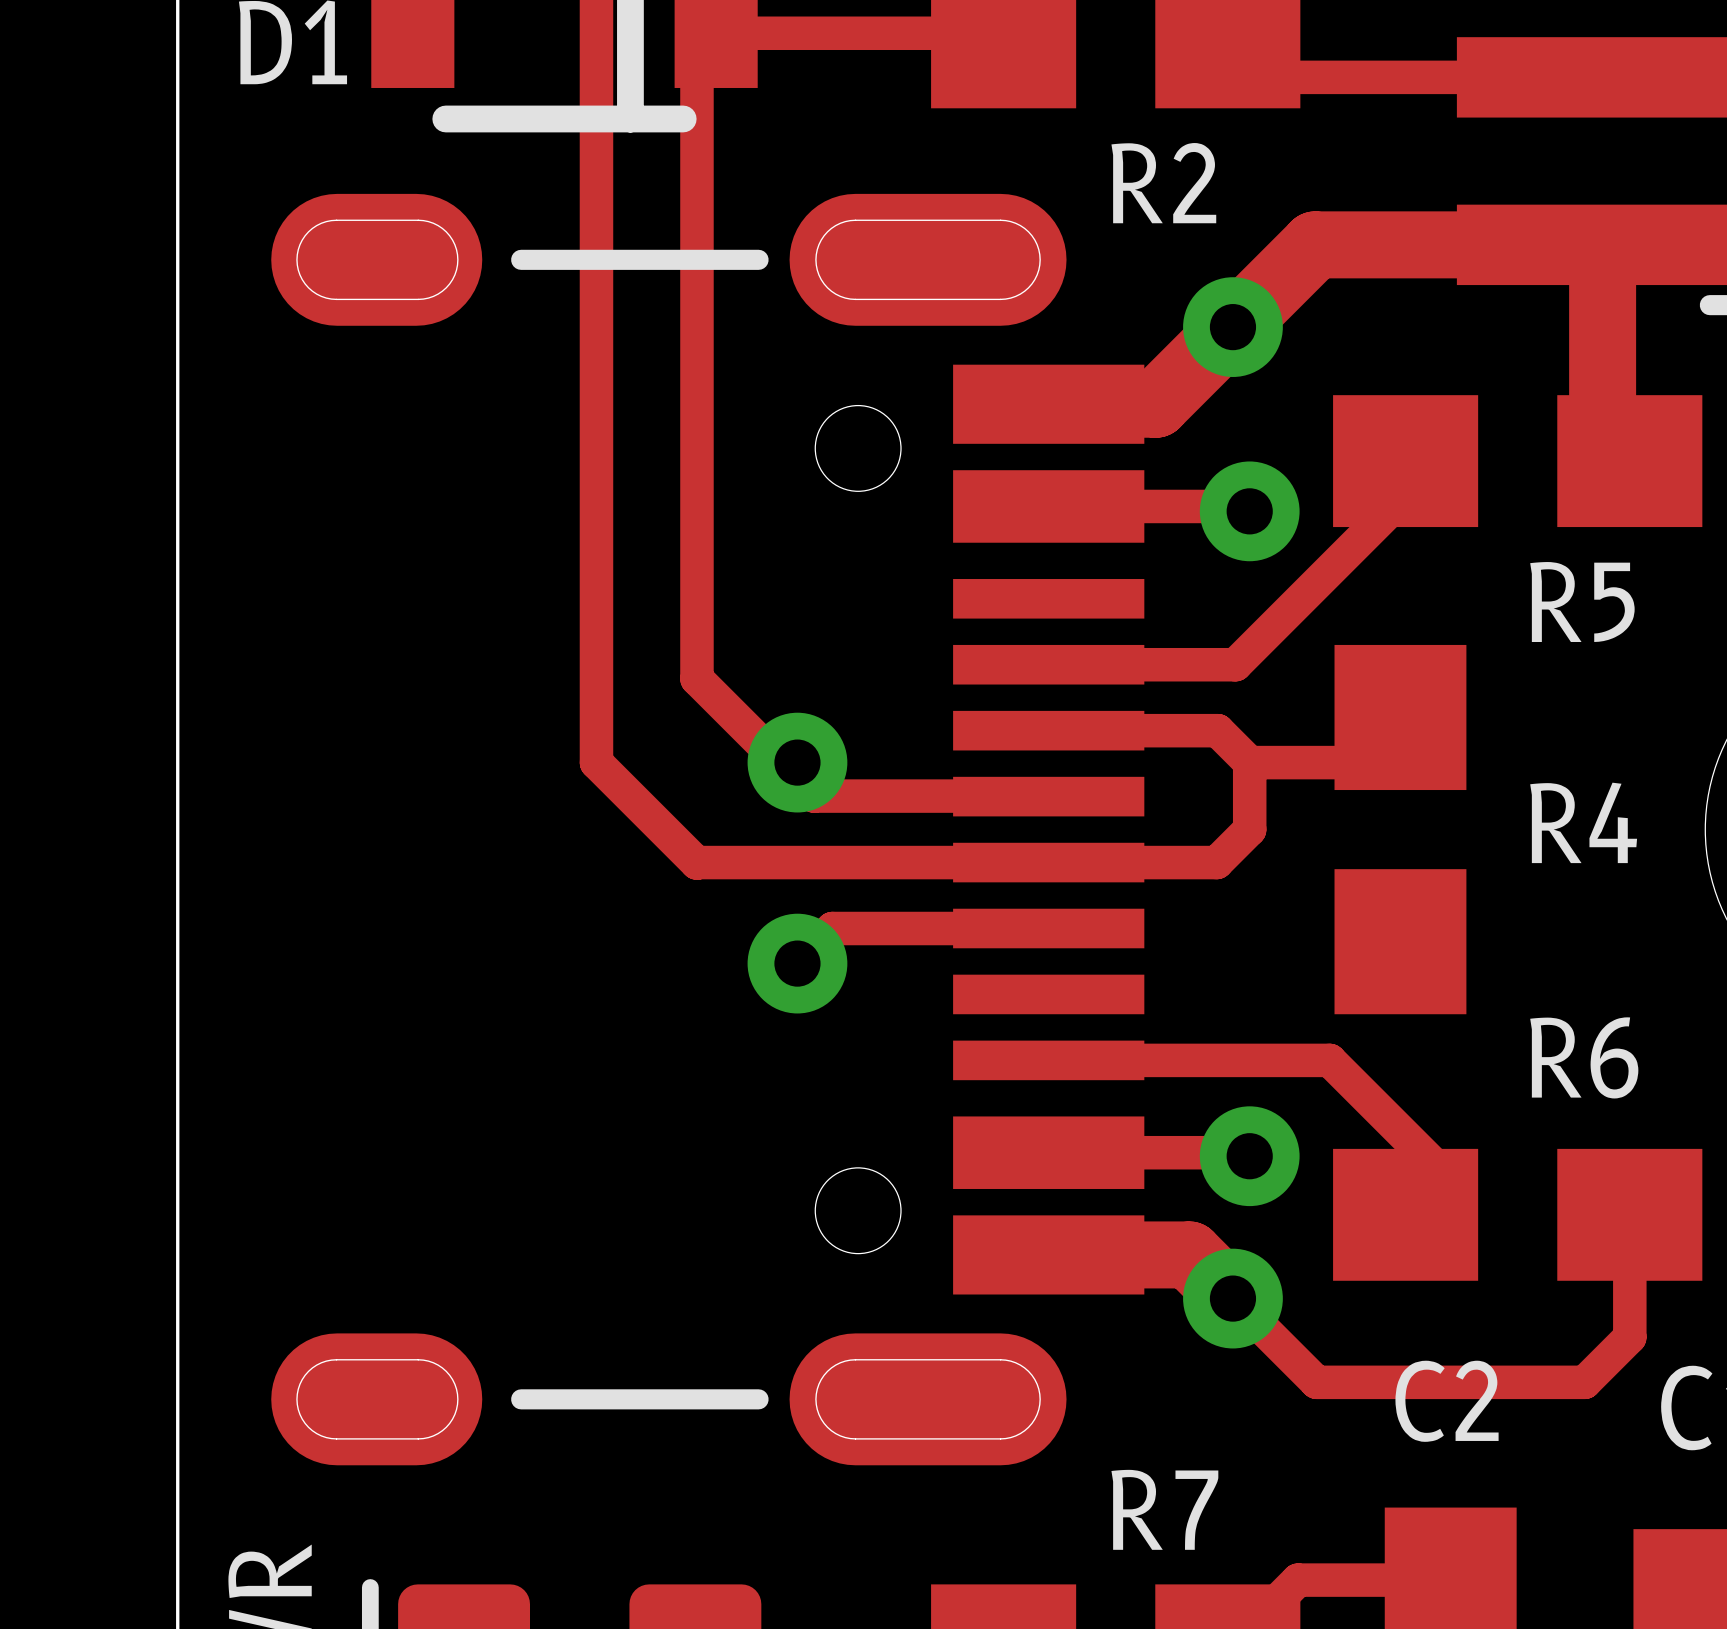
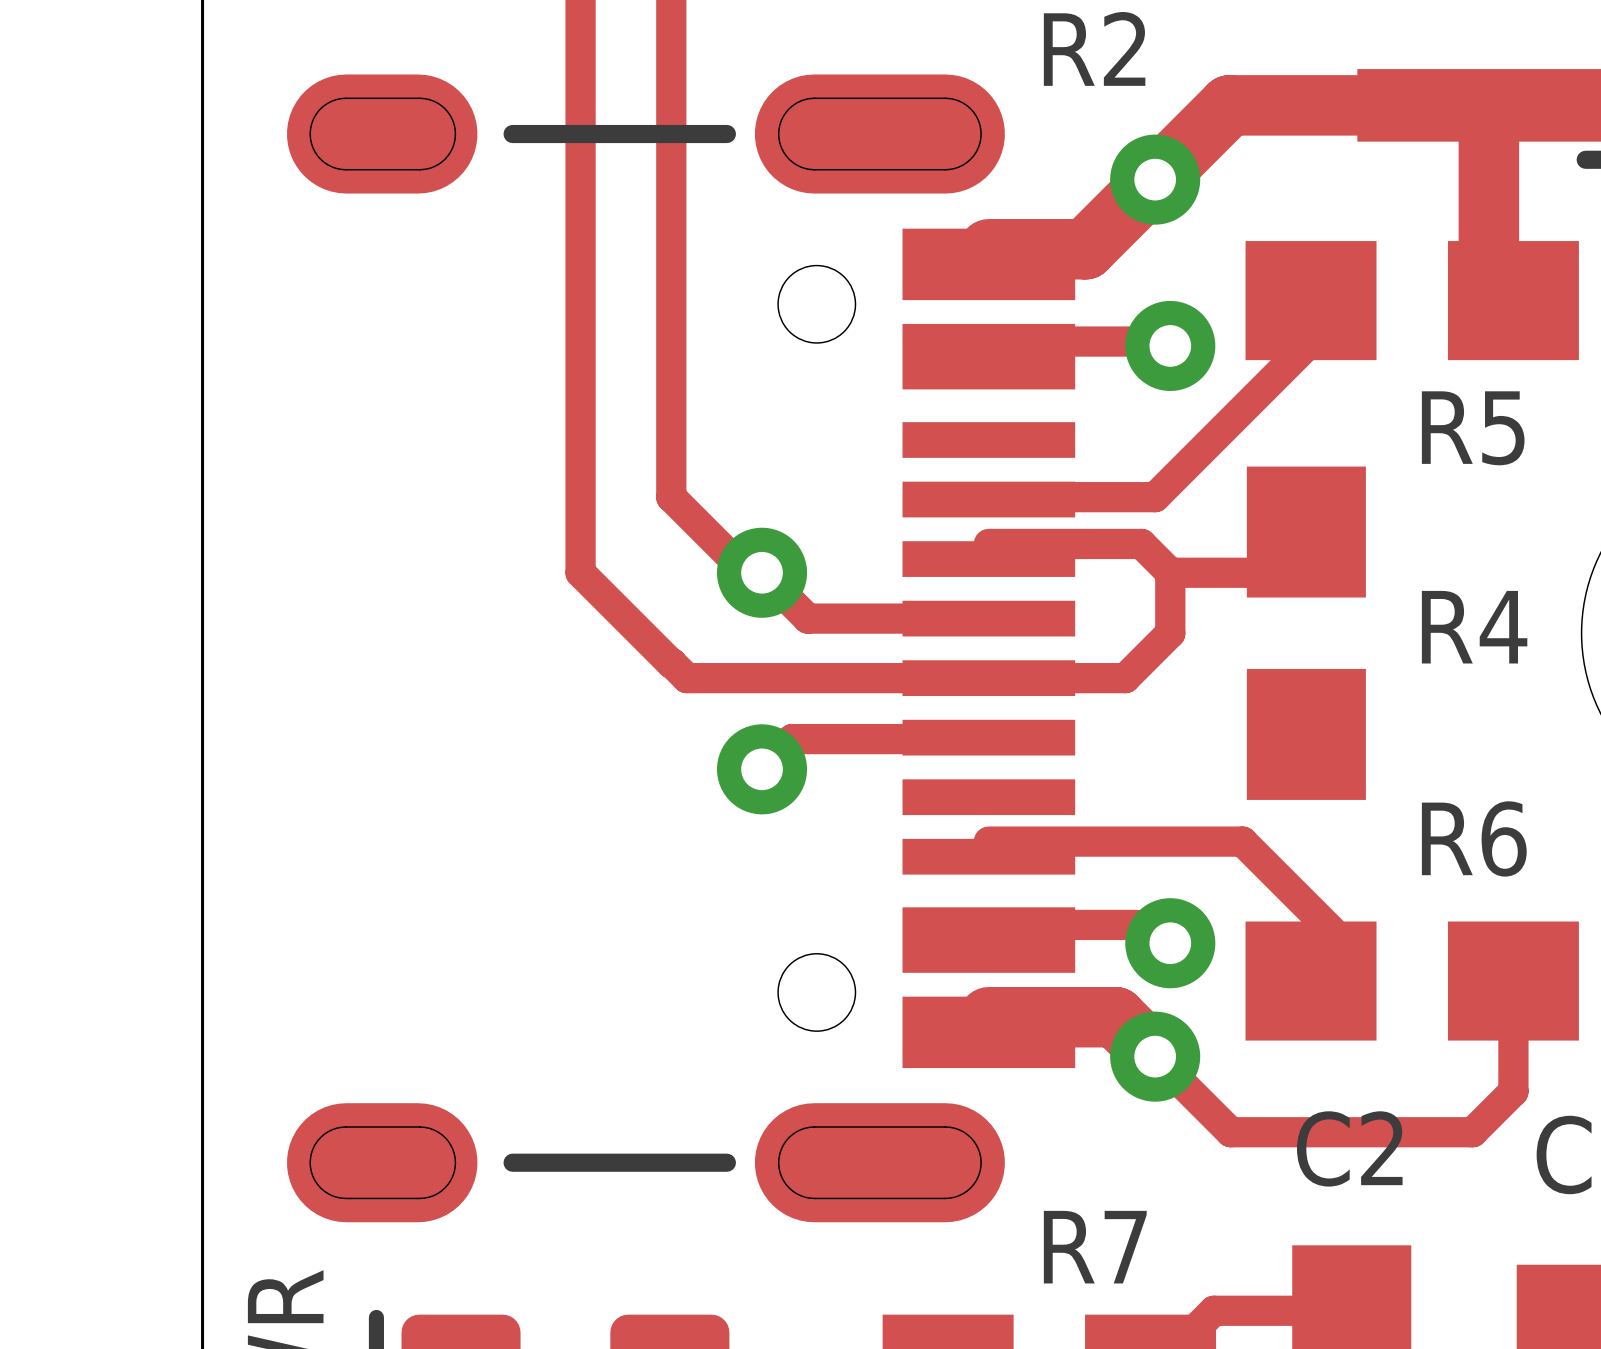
track: (1405, 494) (1235, 664) (1048, 664) -> (1311, 330) (1311, 341) (1155, 497) (991, 497) (988, 499)
track: (797, 762) (797, 779) (814, 796) (1048, 796) -> (762, 572) (807, 618) (988, 618)
part position: (707, 829) -> (681, 648)
track: (697, 862) (1216, 862) -> (671, 663) (686, 678) (1125, 678) (1140, 663)
track: (1048, 928) (832, 928) (797, 963) -> (987, 739) (792, 739) (762, 769)
via position: (797, 963) -> (762, 769)
via position: (1249, 1156) -> (1170, 943)

